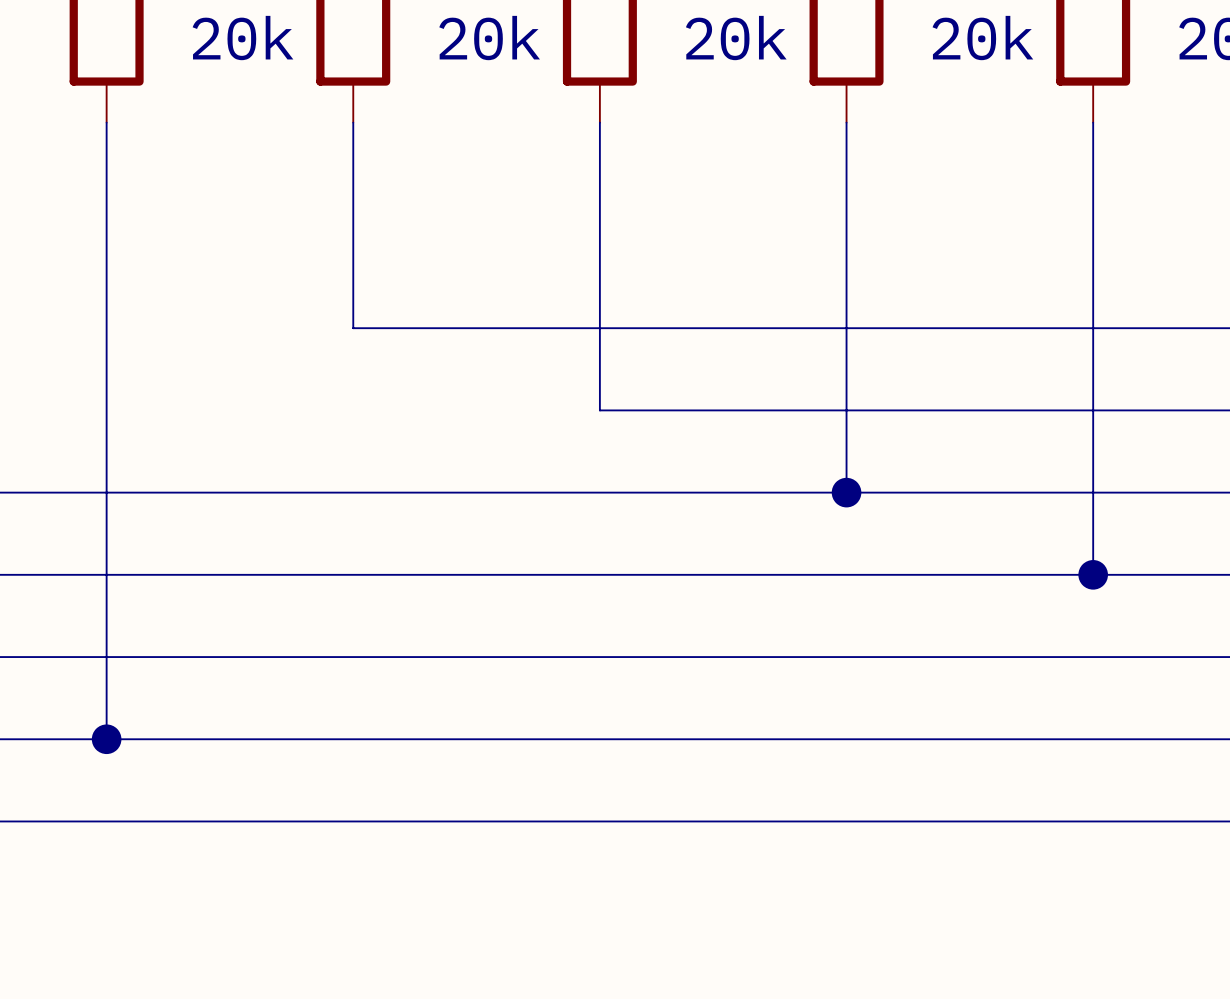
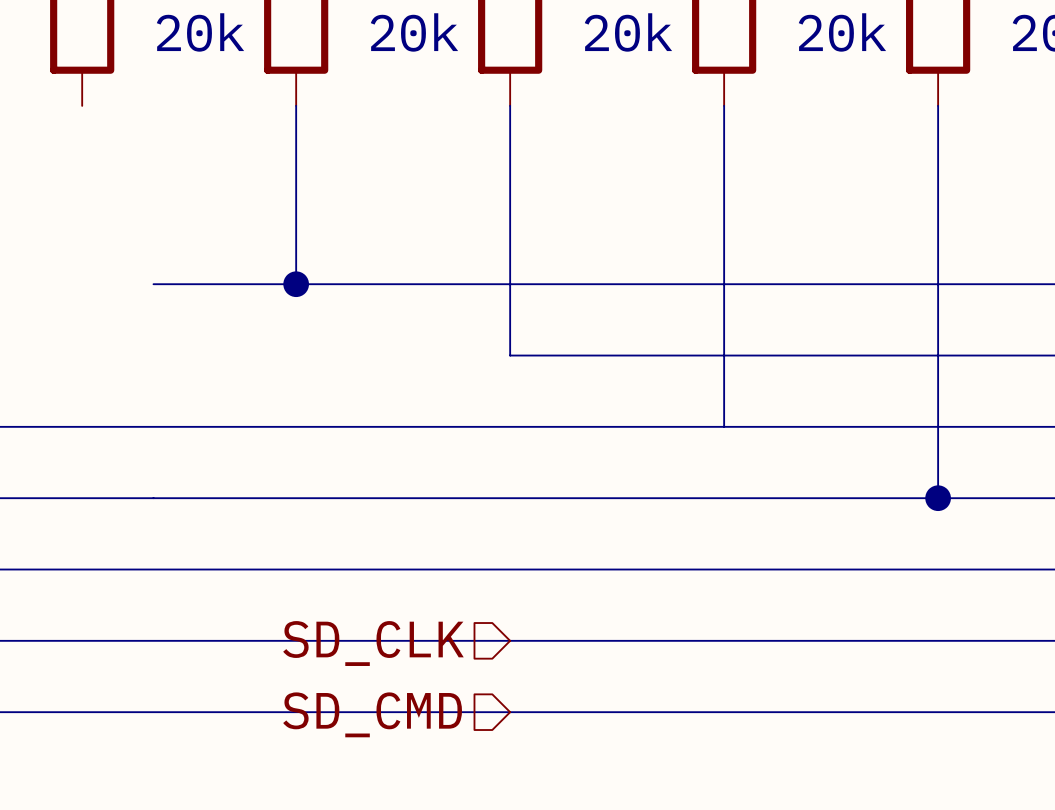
wire: (106, 122) (106, 739) -> none
wire: none -> (153, 284) (296, 284)
junction: none -> (296, 284)
junction: (846, 492) -> none
junction: (106, 739) -> none
hierarchical label: none -> SD_CLK (373, 643)
hierarchical label: none -> SD_CMD (372, 714)

